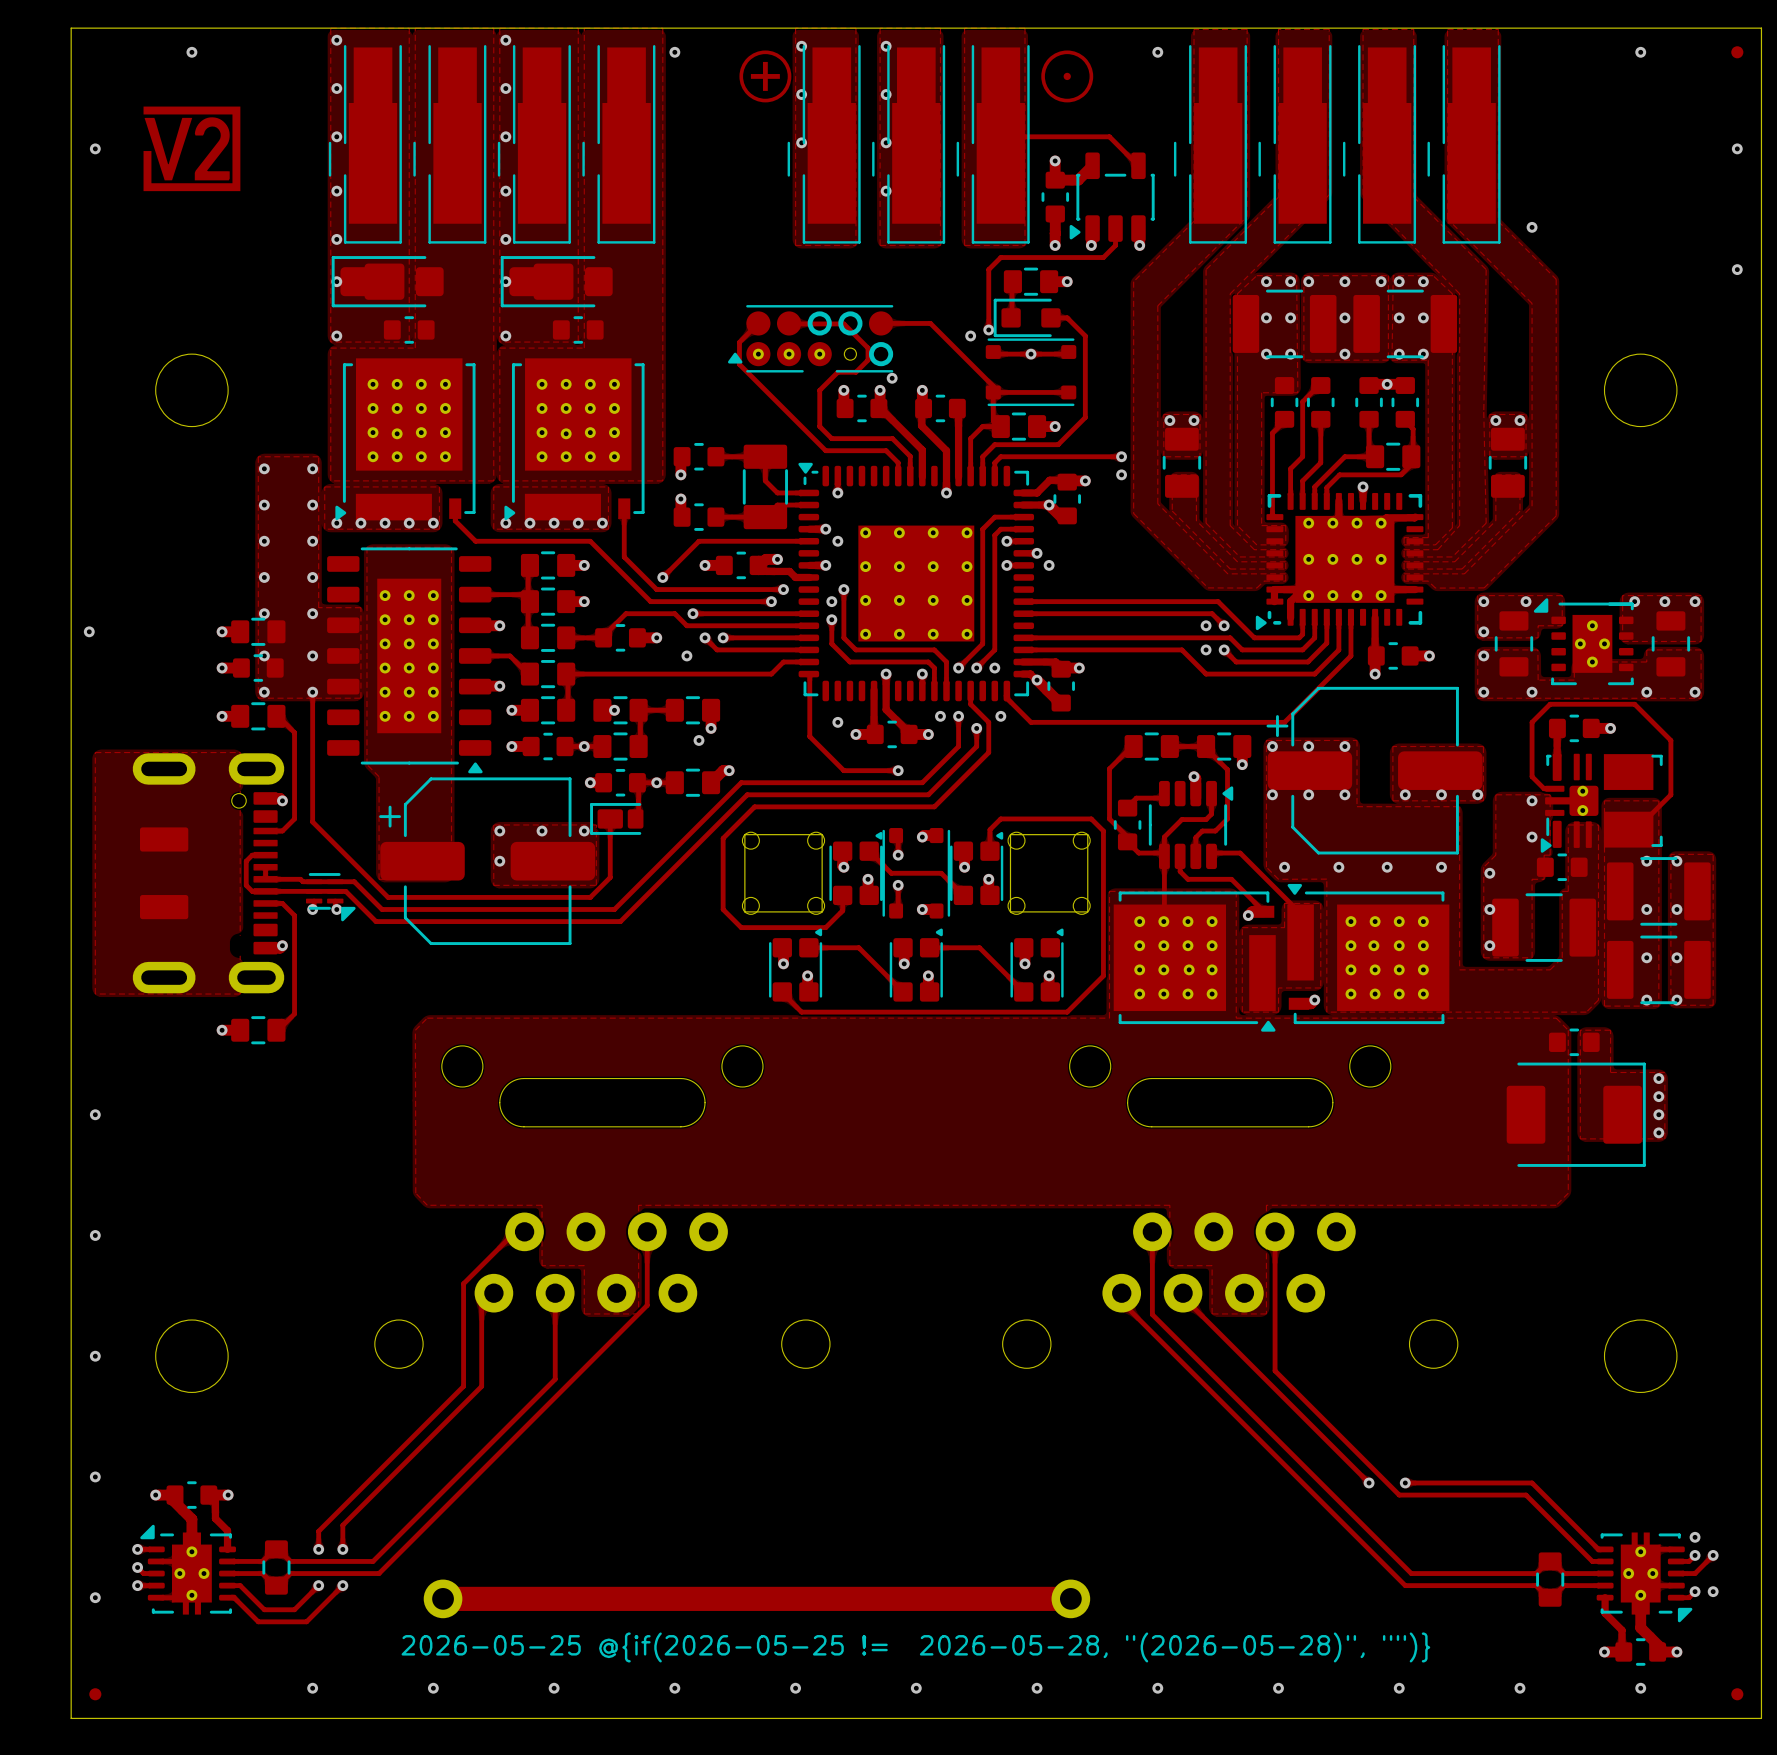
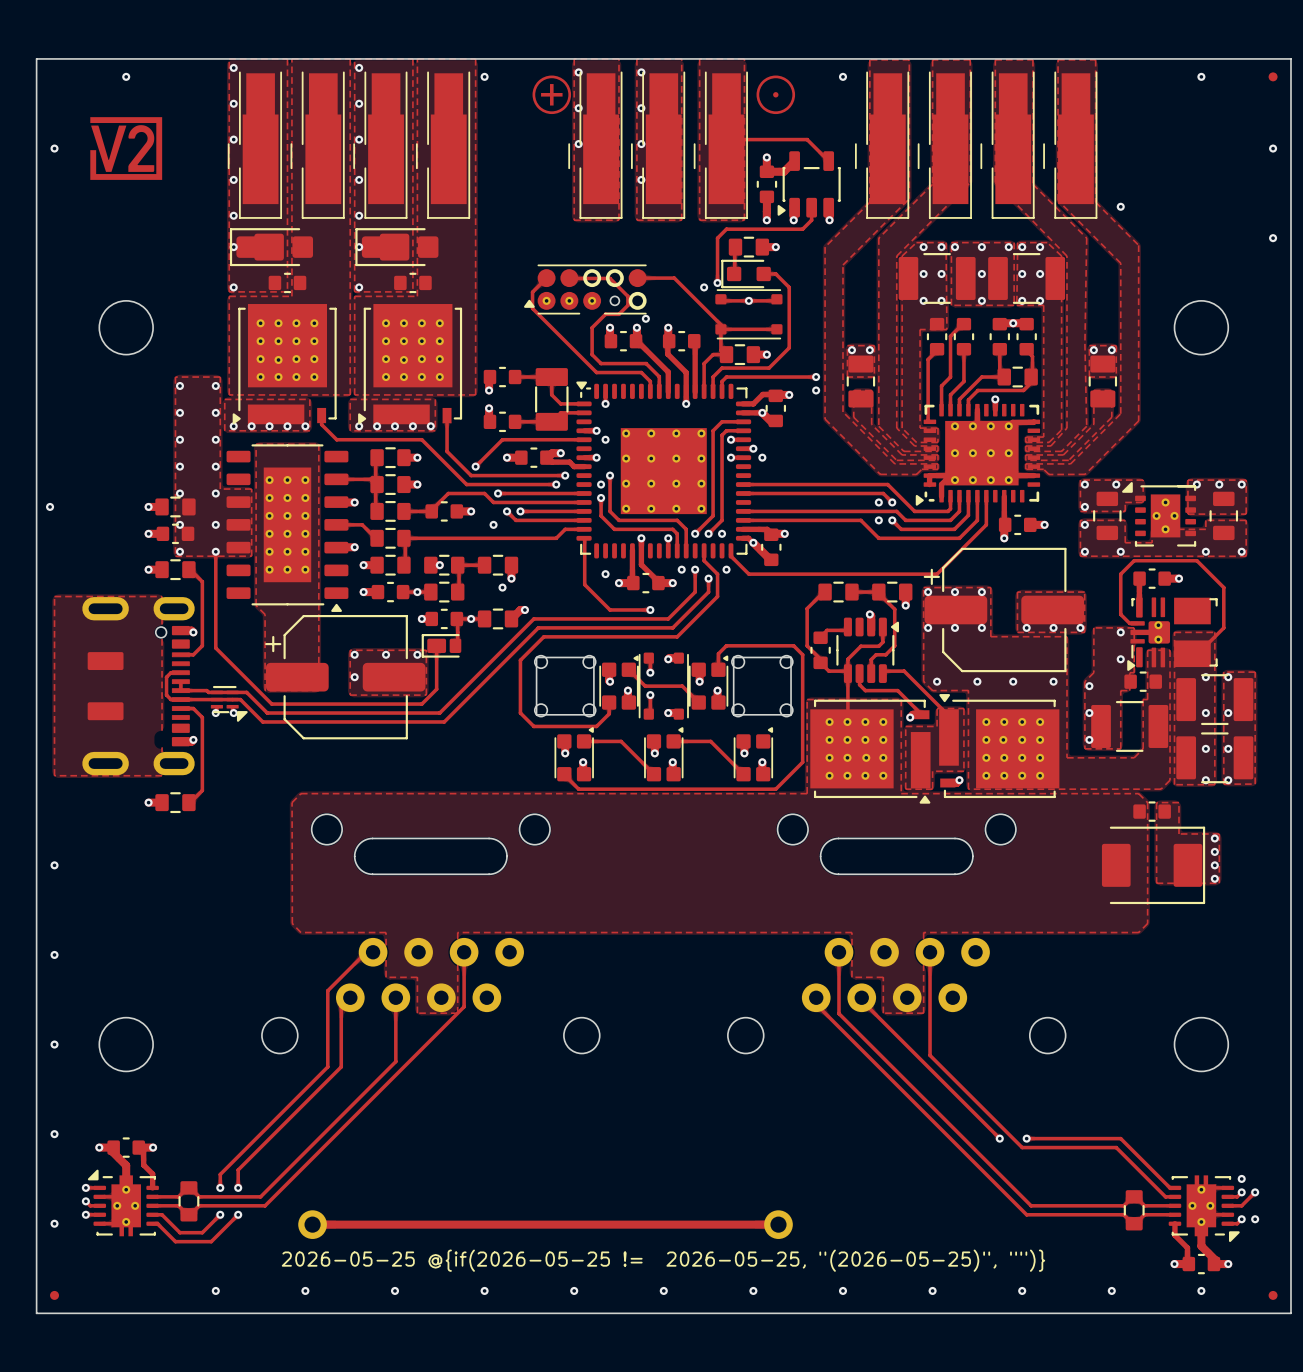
track width: thick (443, 1598) (1070, 1598) -> thin (312, 1224) (778, 1224)
drawing shape: [401, 1632, 1431, 1663] -> [281, 1249, 1046, 1272]

